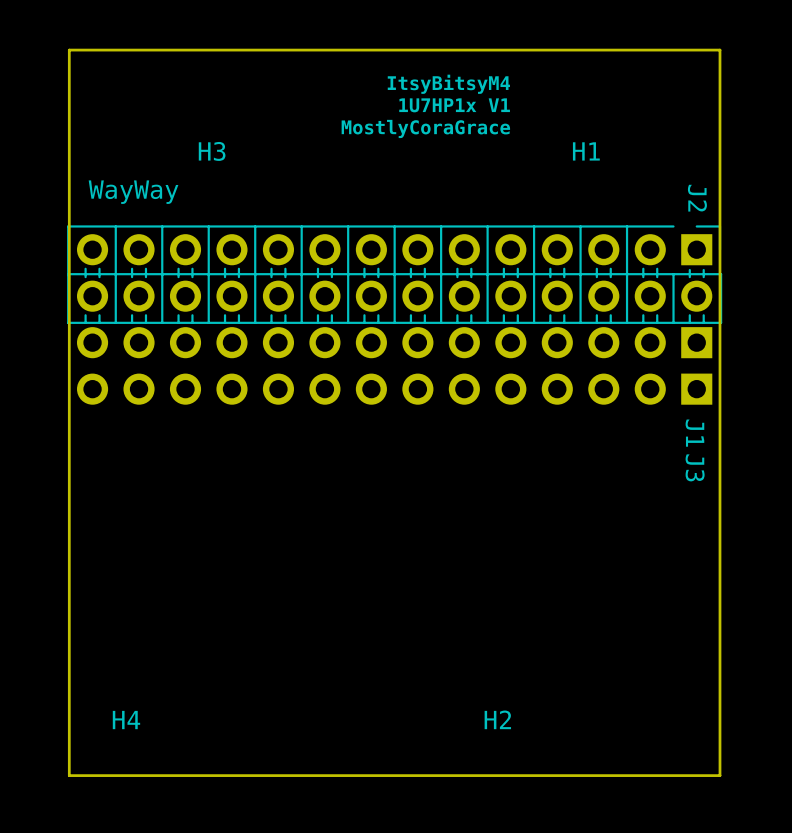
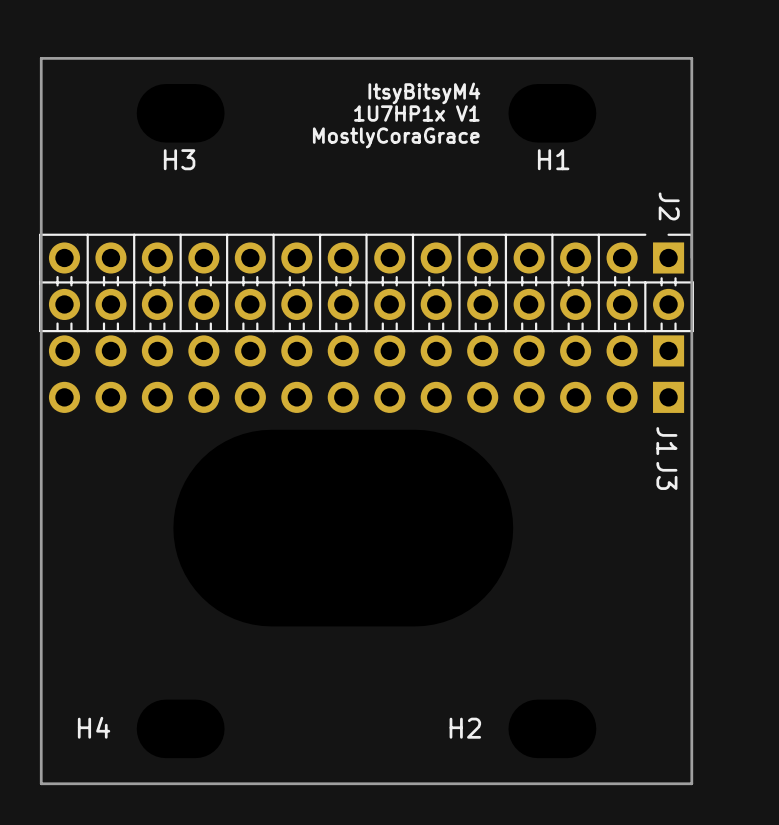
text: WayWay (133, 192) -> none

